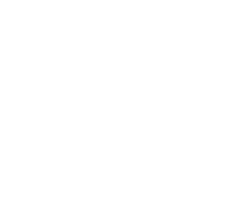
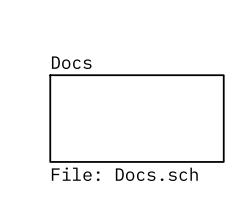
sheet Docs: none -> File: Docs.sch (136, 118)

